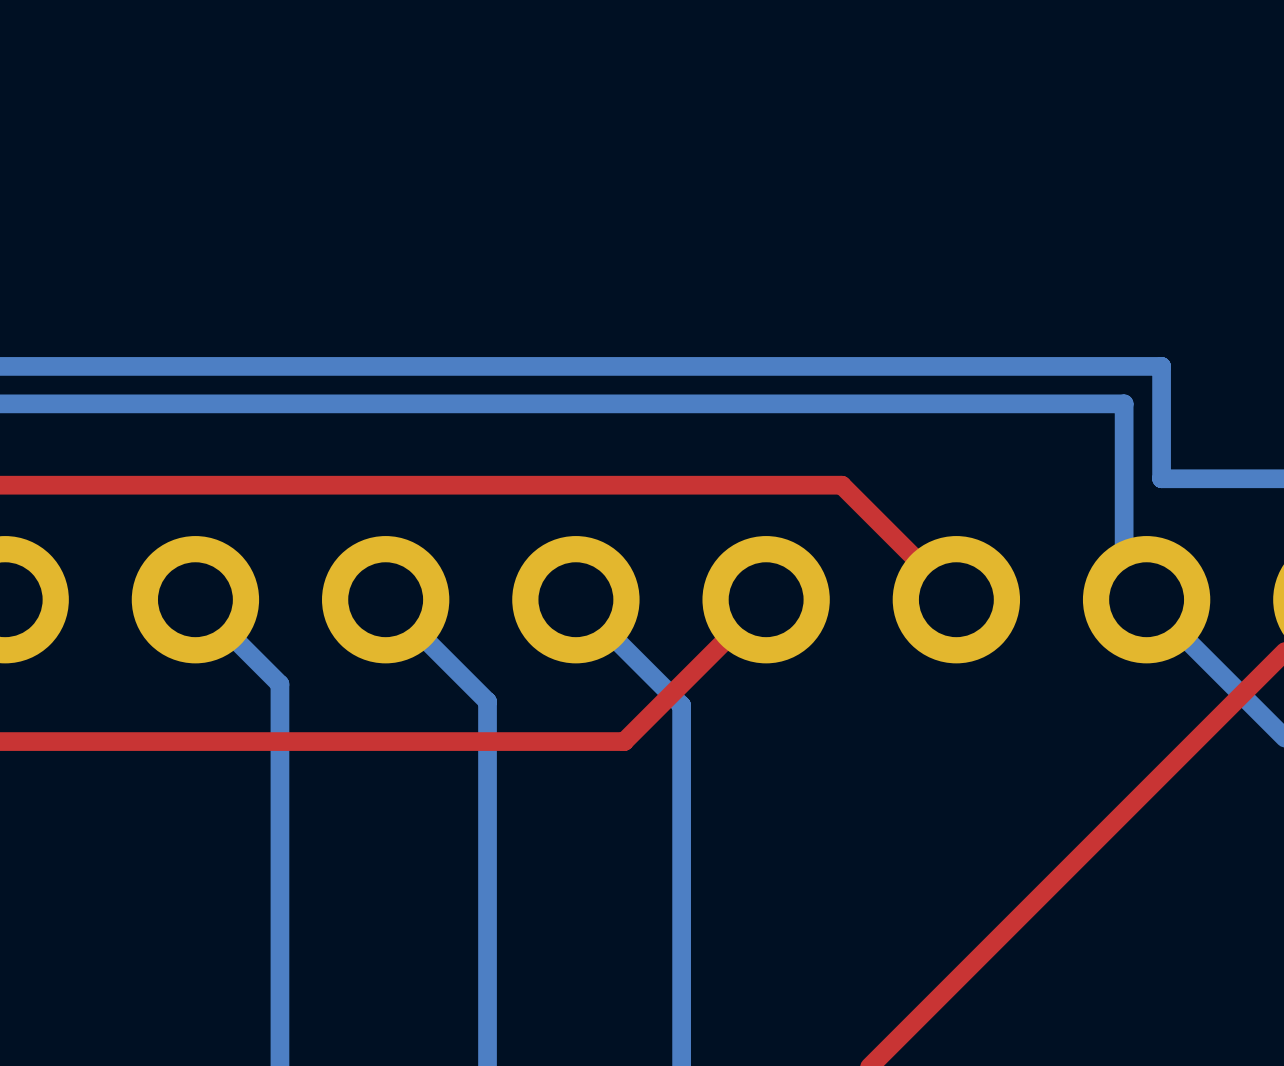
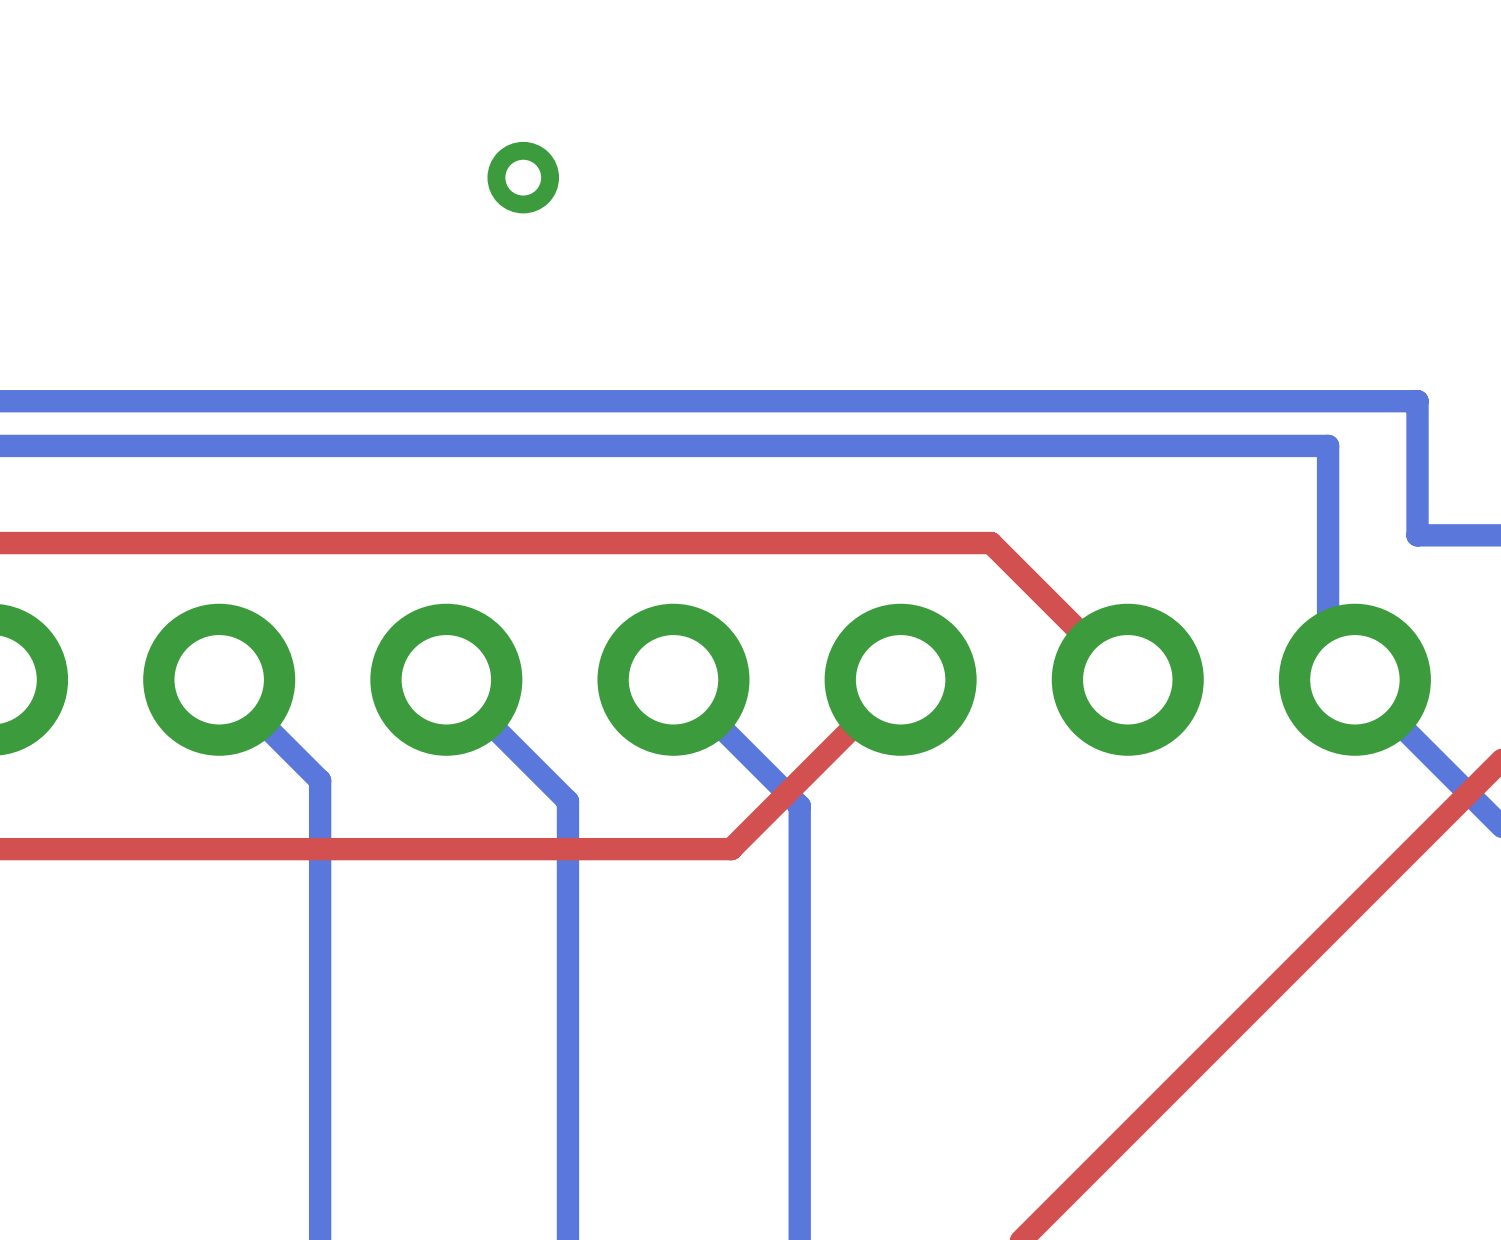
via: none -> (523, 177)
bottom track: (1161, 366) (1161, 478) (1199, 478) -> (1372, 401) (1417, 401) (1417, 535)

